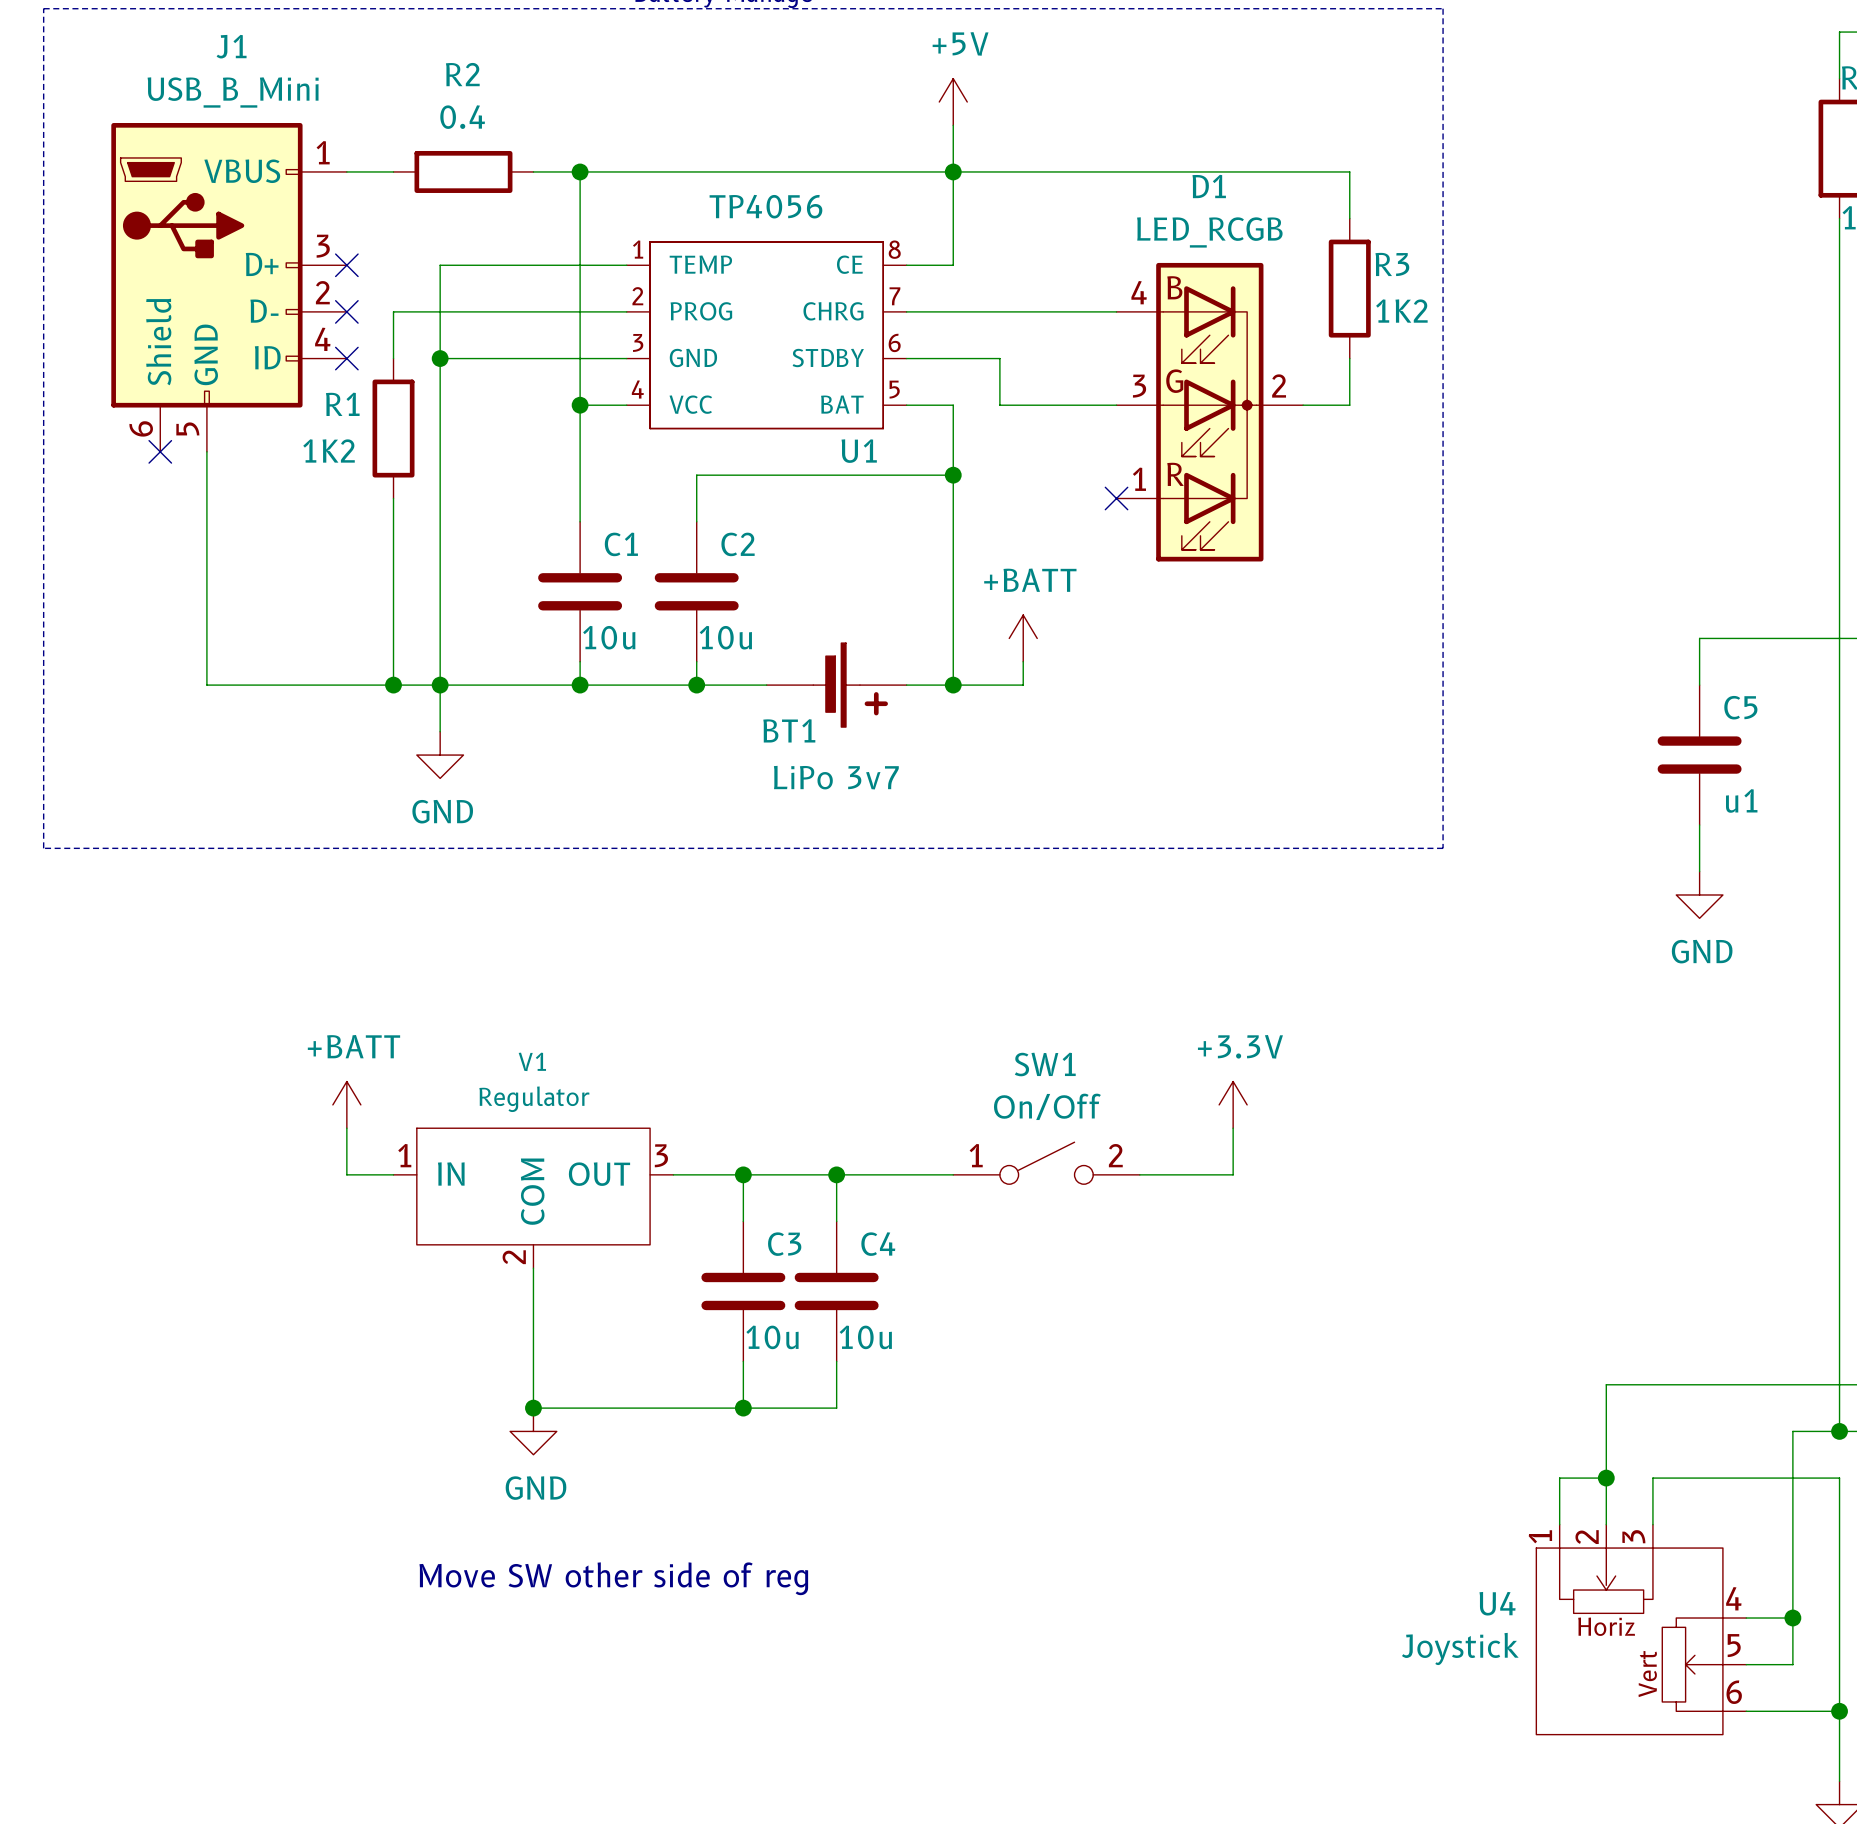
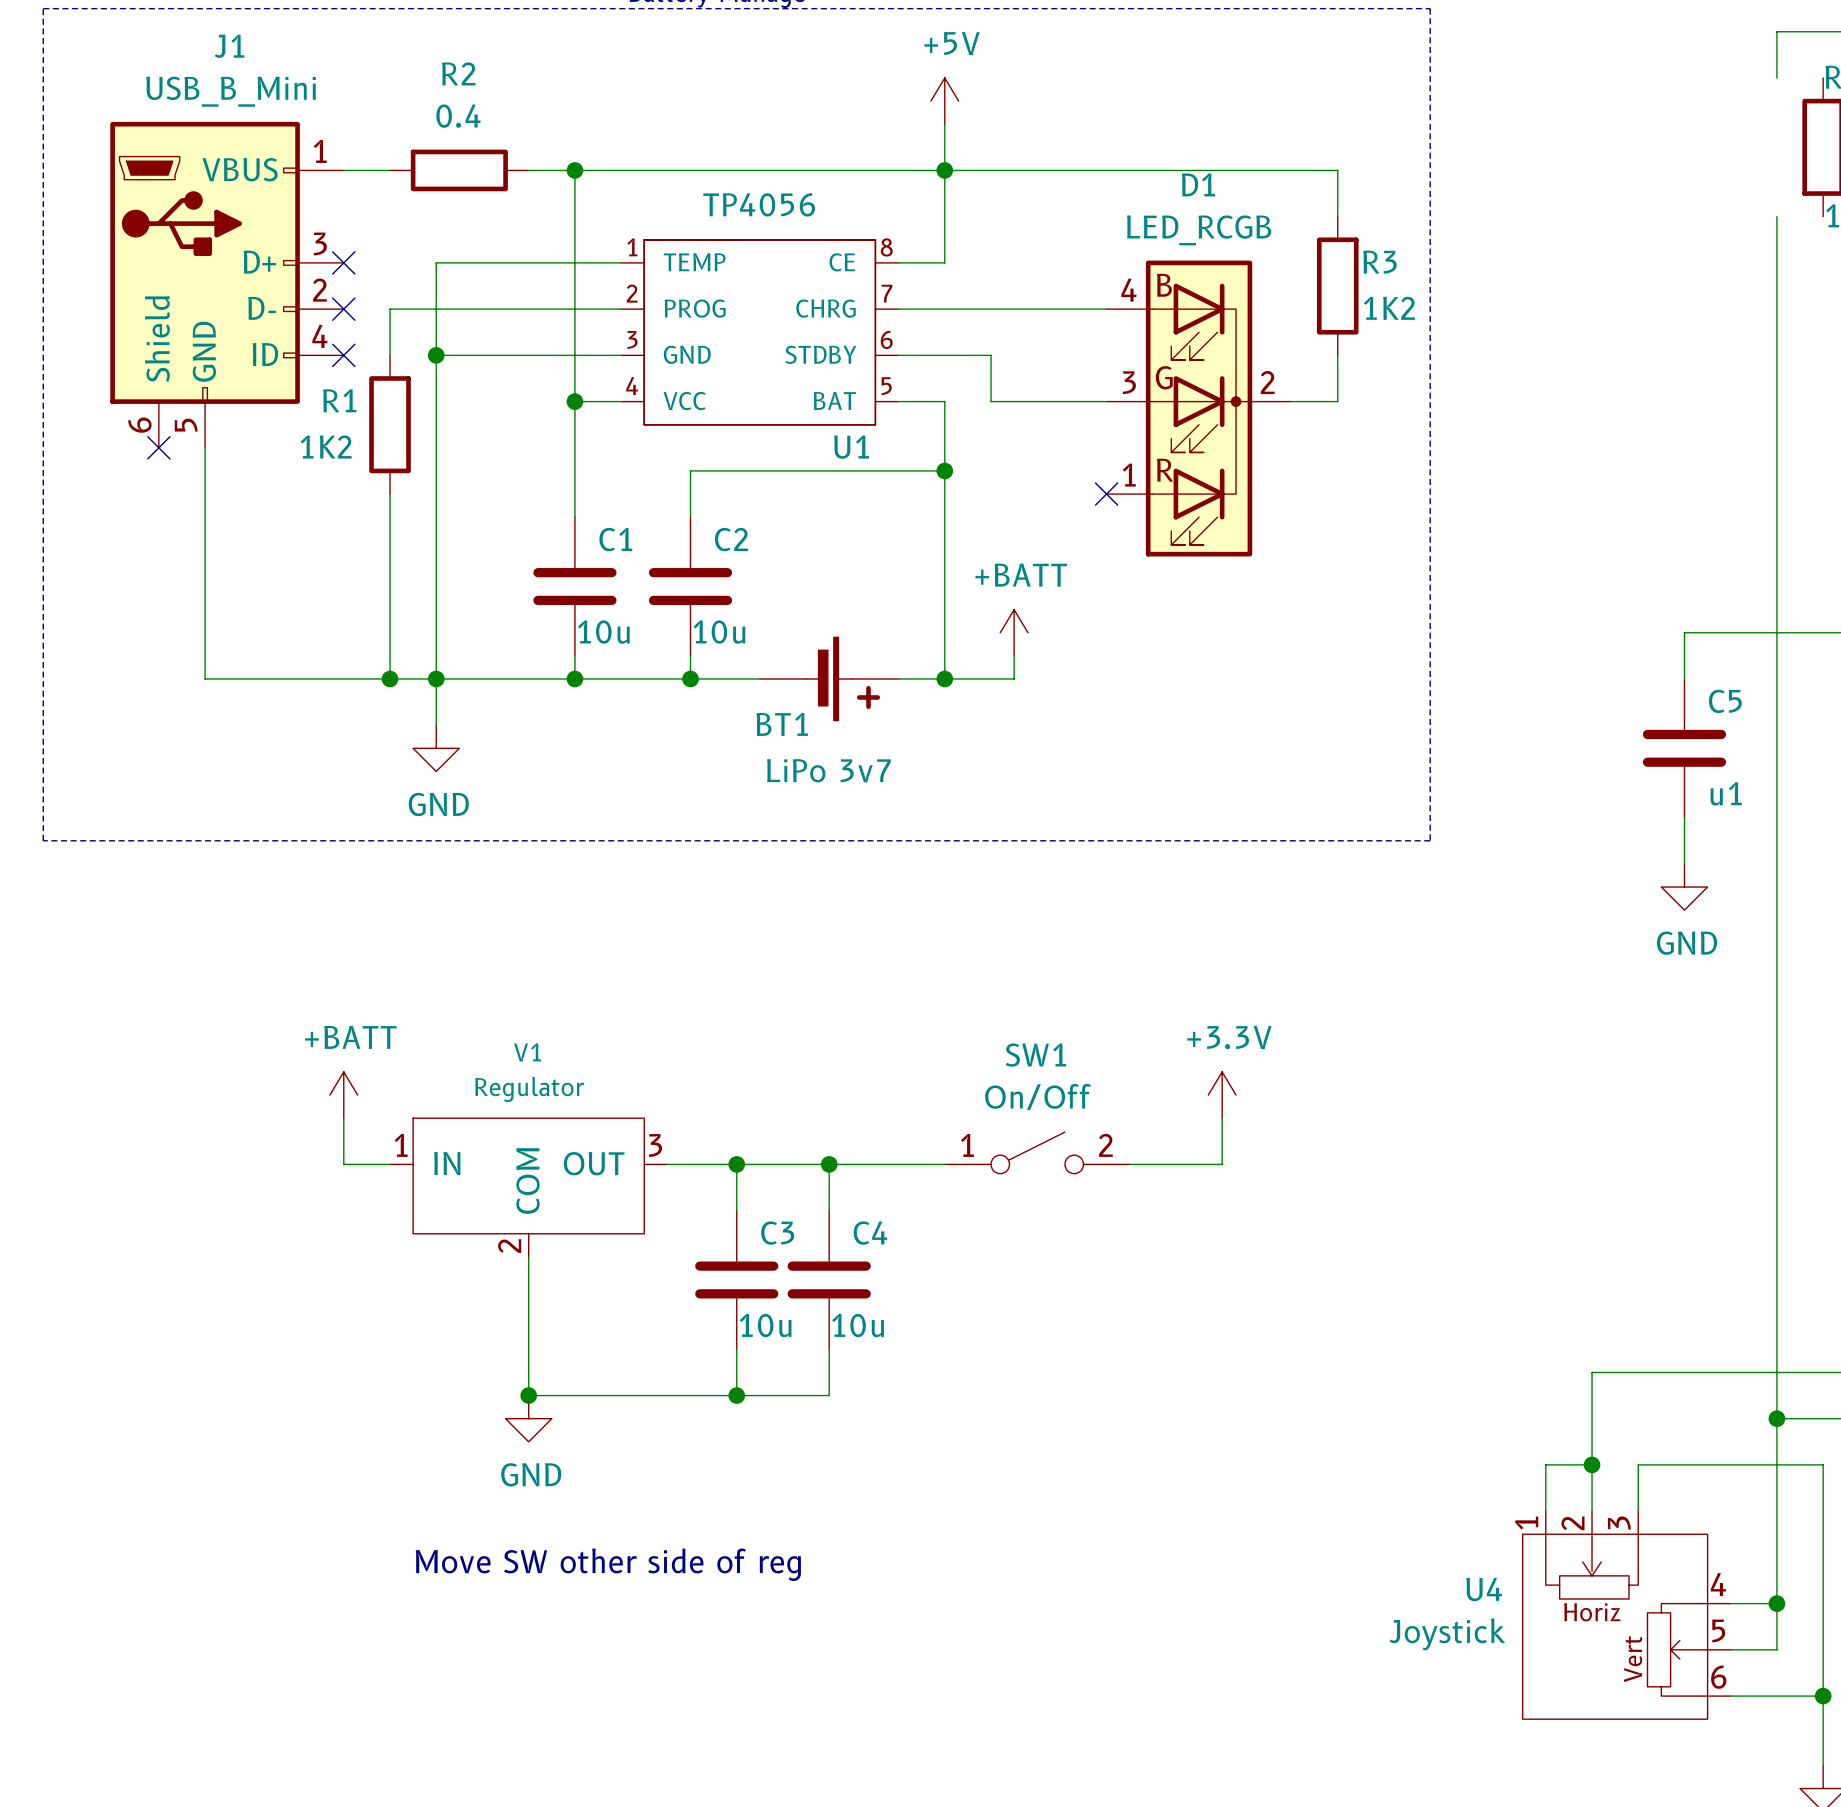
wire: (1839, 32) (1839, 78) -> (1823, 31) (1776, 31) (1776, 77)
wire: (1839, 218) (1839, 1431) -> (1776, 216) (1776, 1418)
junction position: (1839, 1431) -> (1776, 1418)

